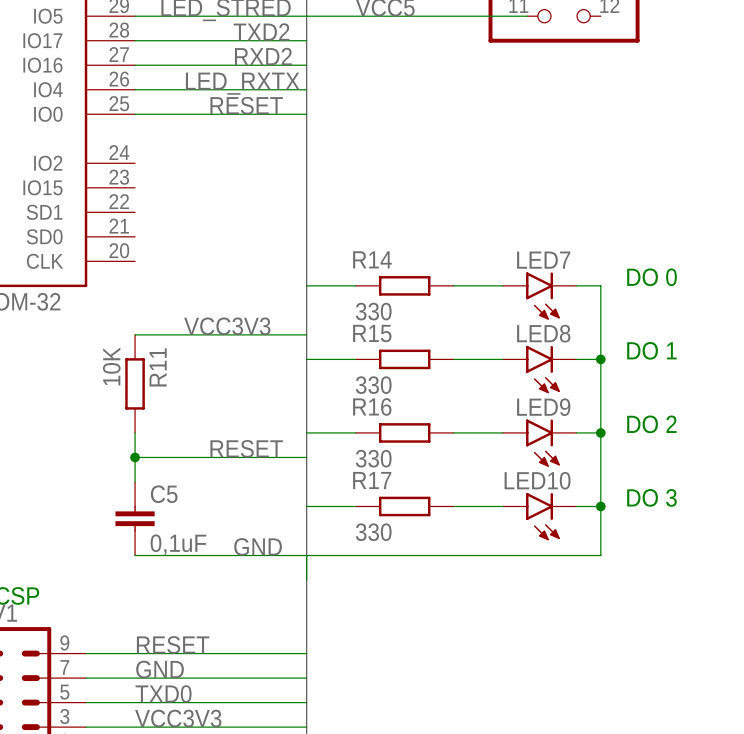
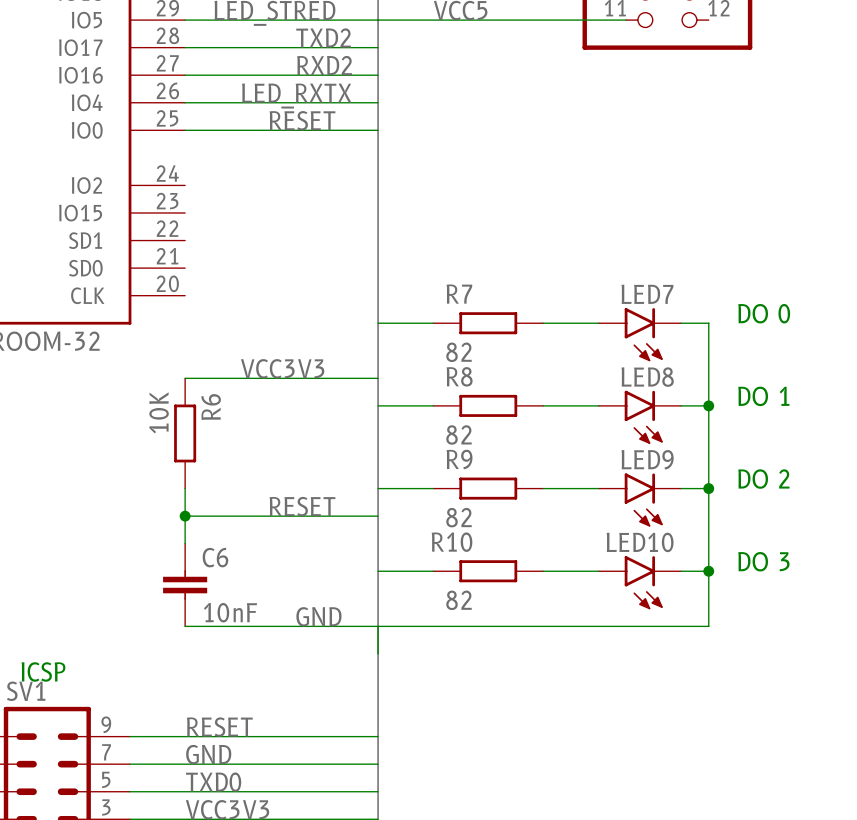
R14 name: R14 (372, 259) -> R7 (459, 294)
R14 value: 330 (373, 311) -> 82 (458, 352)
R15 name: R15 (372, 333) -> R8 (459, 376)
R11 name: R11 (158, 367) -> R6 (211, 407)
R15 value: 330 (373, 385) -> 82 (458, 434)
R16 name: R16 (372, 406) -> R9 (459, 459)
R16 value: 330 (373, 458) -> 82 (458, 517)
R17 name: R17 (372, 480) -> R10 (452, 542)
C5 name: C5 (164, 494) -> C6 (215, 557)
R17 value: 330 (373, 532) -> 82 (458, 600)
C5 value: 0,1uF (178, 544) -> 10nF (230, 612)

